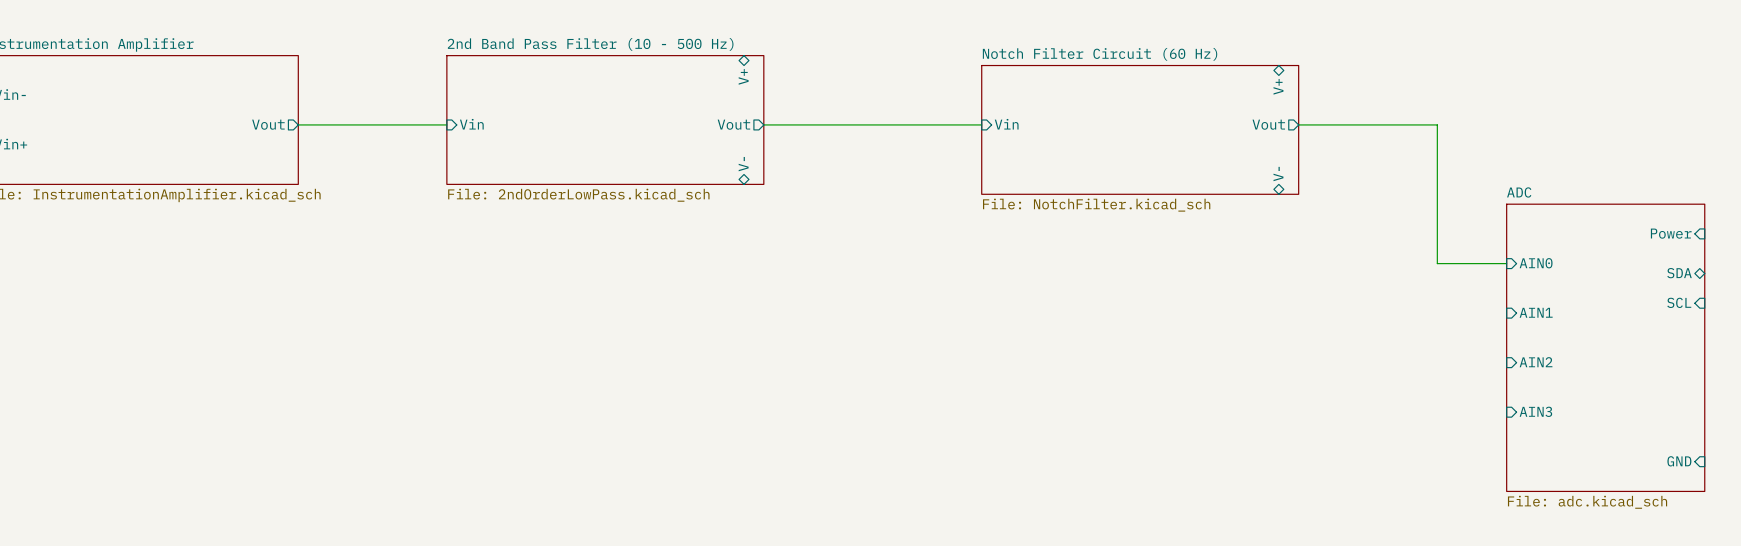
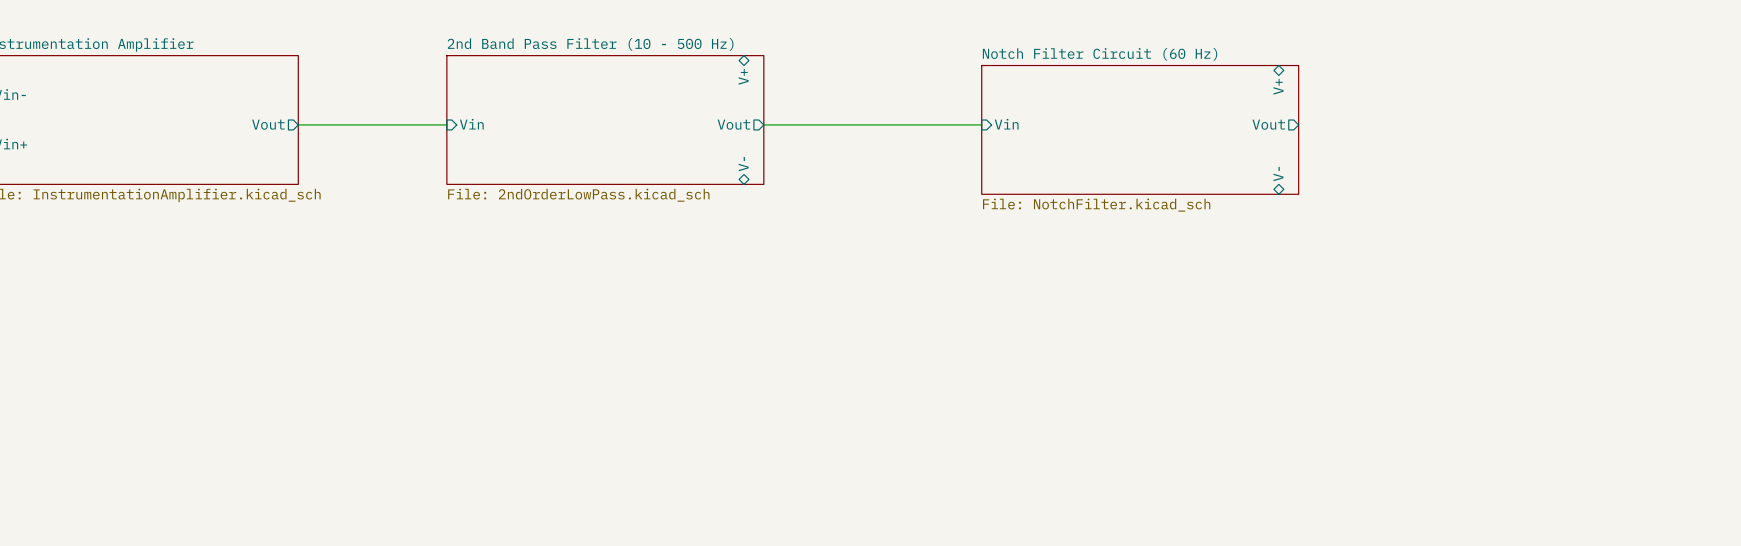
wire: (1298, 124) (1437, 124) (1437, 263) (1506, 263) -> none
sheet pin: Power (1671, 233) -> none
sheet pin: AIN0 (1536, 263) -> none
sheet pin: SDA (1679, 273) -> none
sheet pin: SCL (1679, 302) -> none
sheet pin: AIN1 (1536, 312) -> none
sheet ADC: File: adc.kicad_sch (1605, 347) -> none
sheet pin: AIN2 (1536, 362) -> none
sheet pin: AIN3 (1535, 411) -> none
sheet pin: GND (1679, 461) -> none

